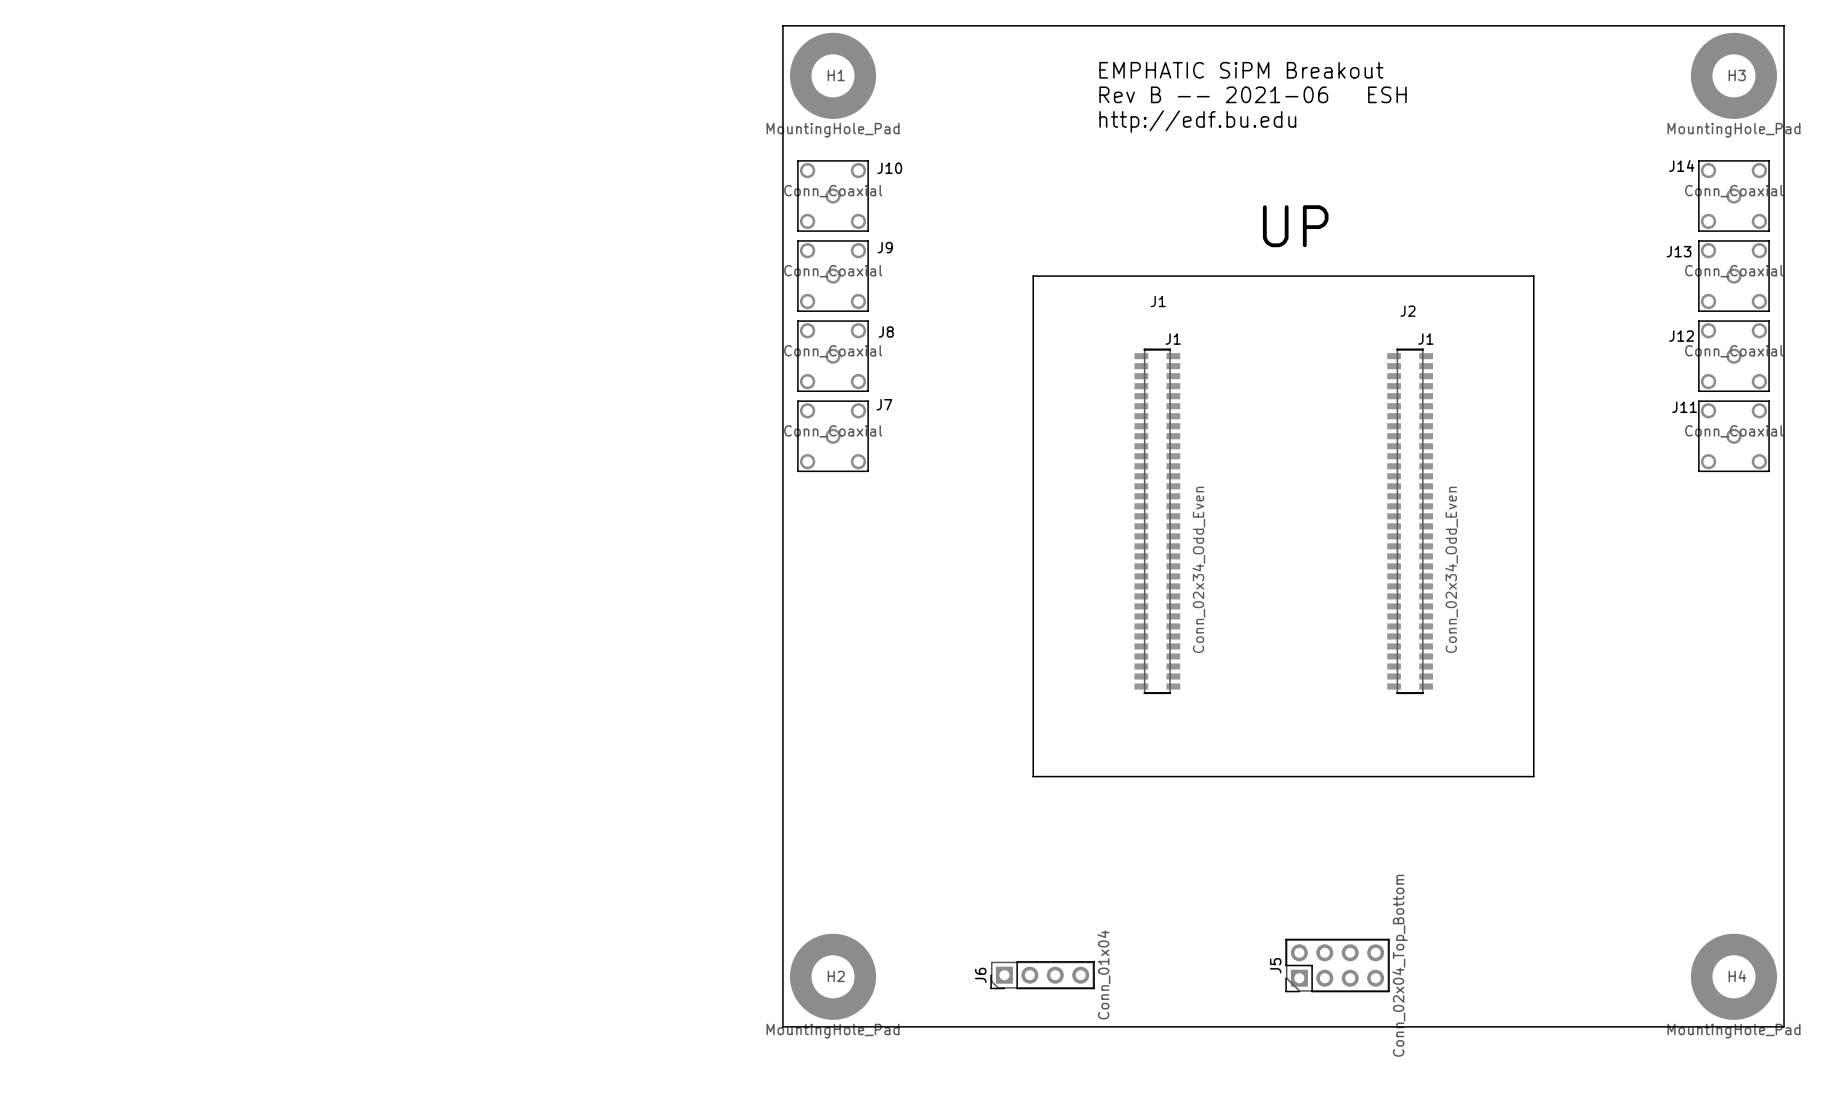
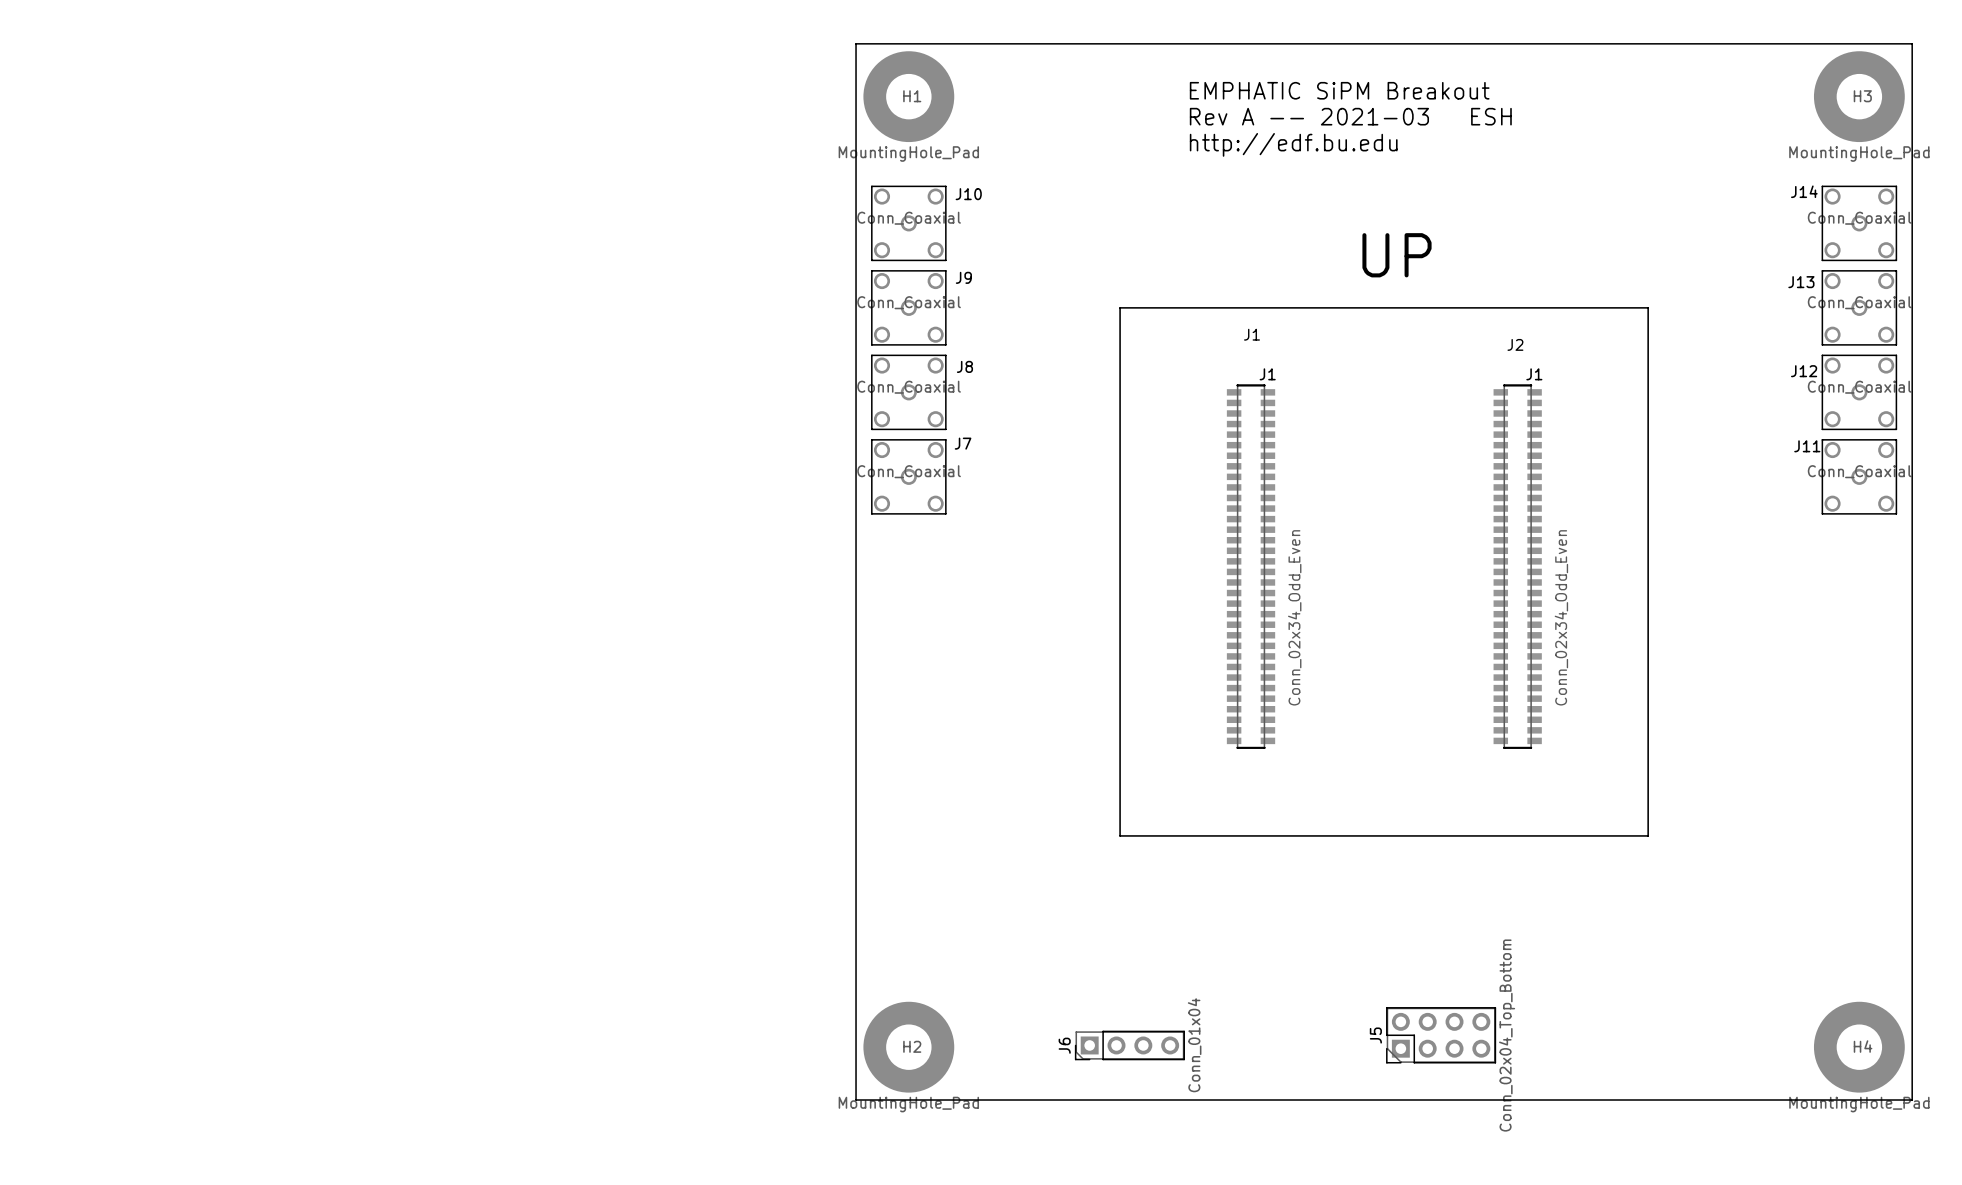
text: Rev B -- 2021-06 ESH (1253, 94) -> Rev A -- 2021-03 ESH (1350, 116)

